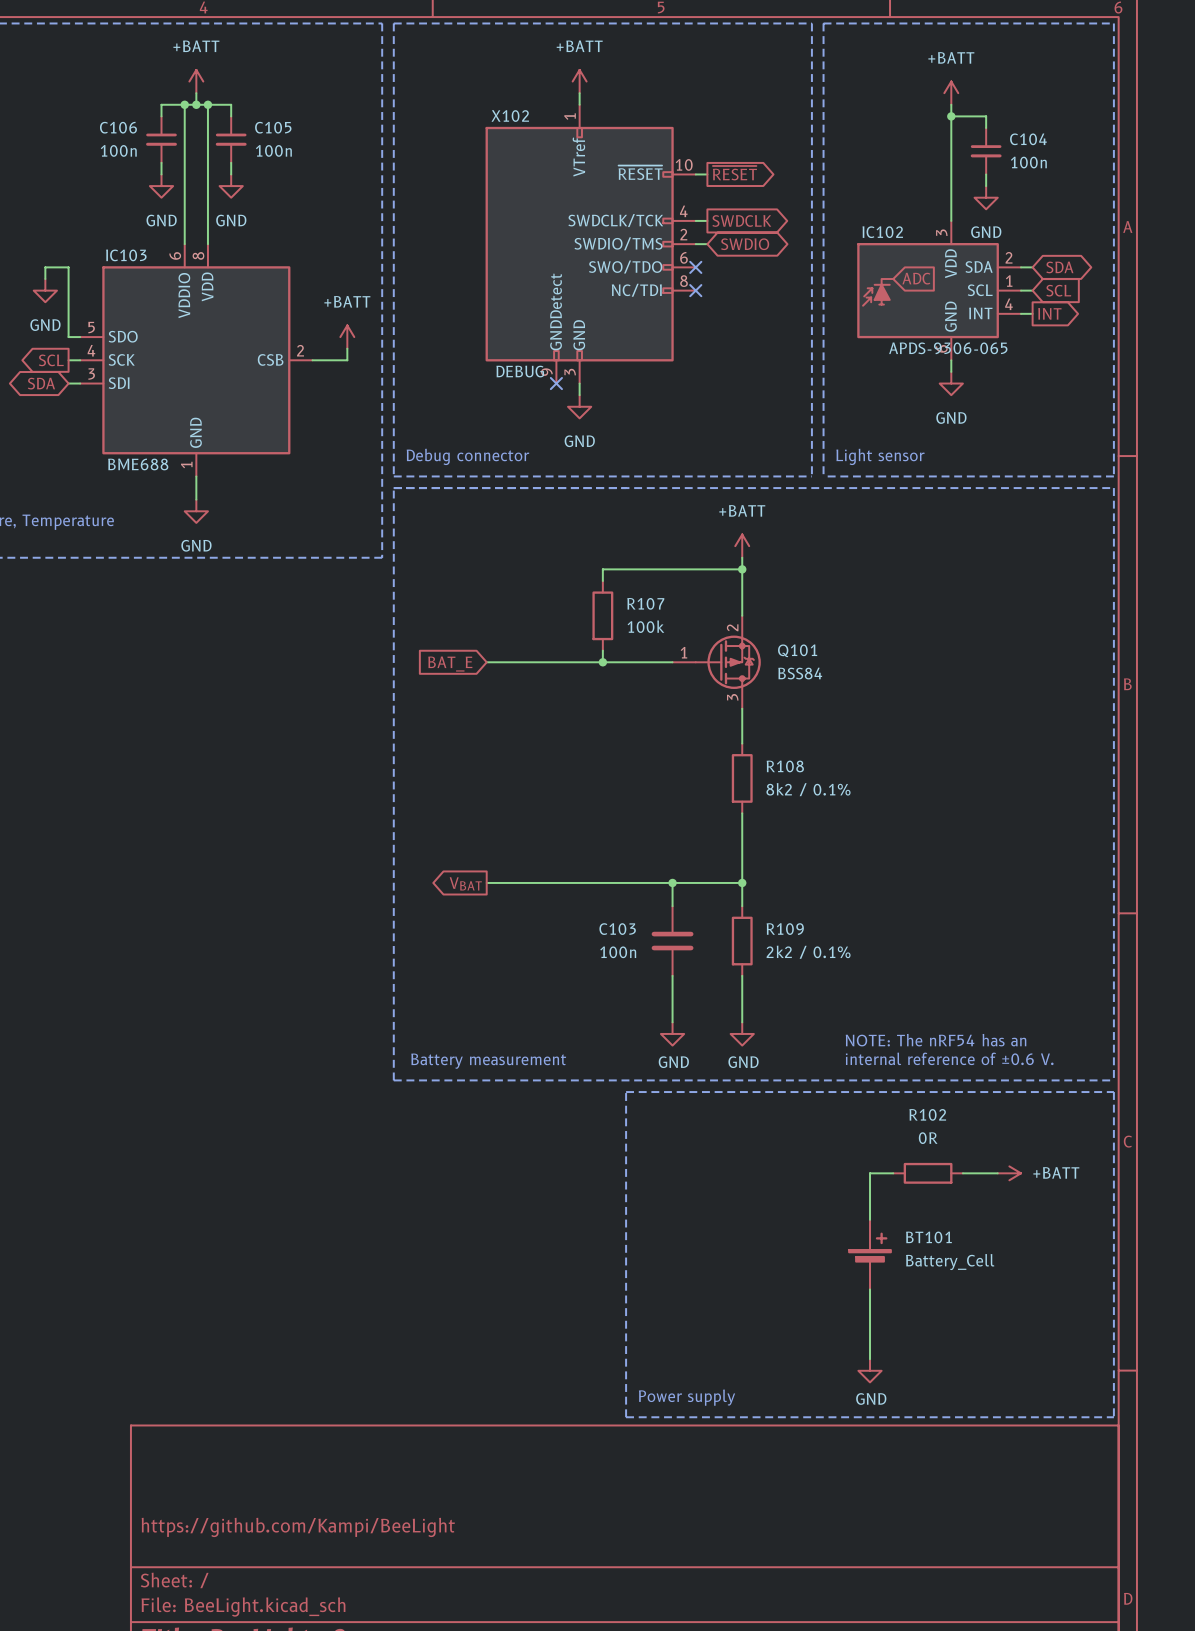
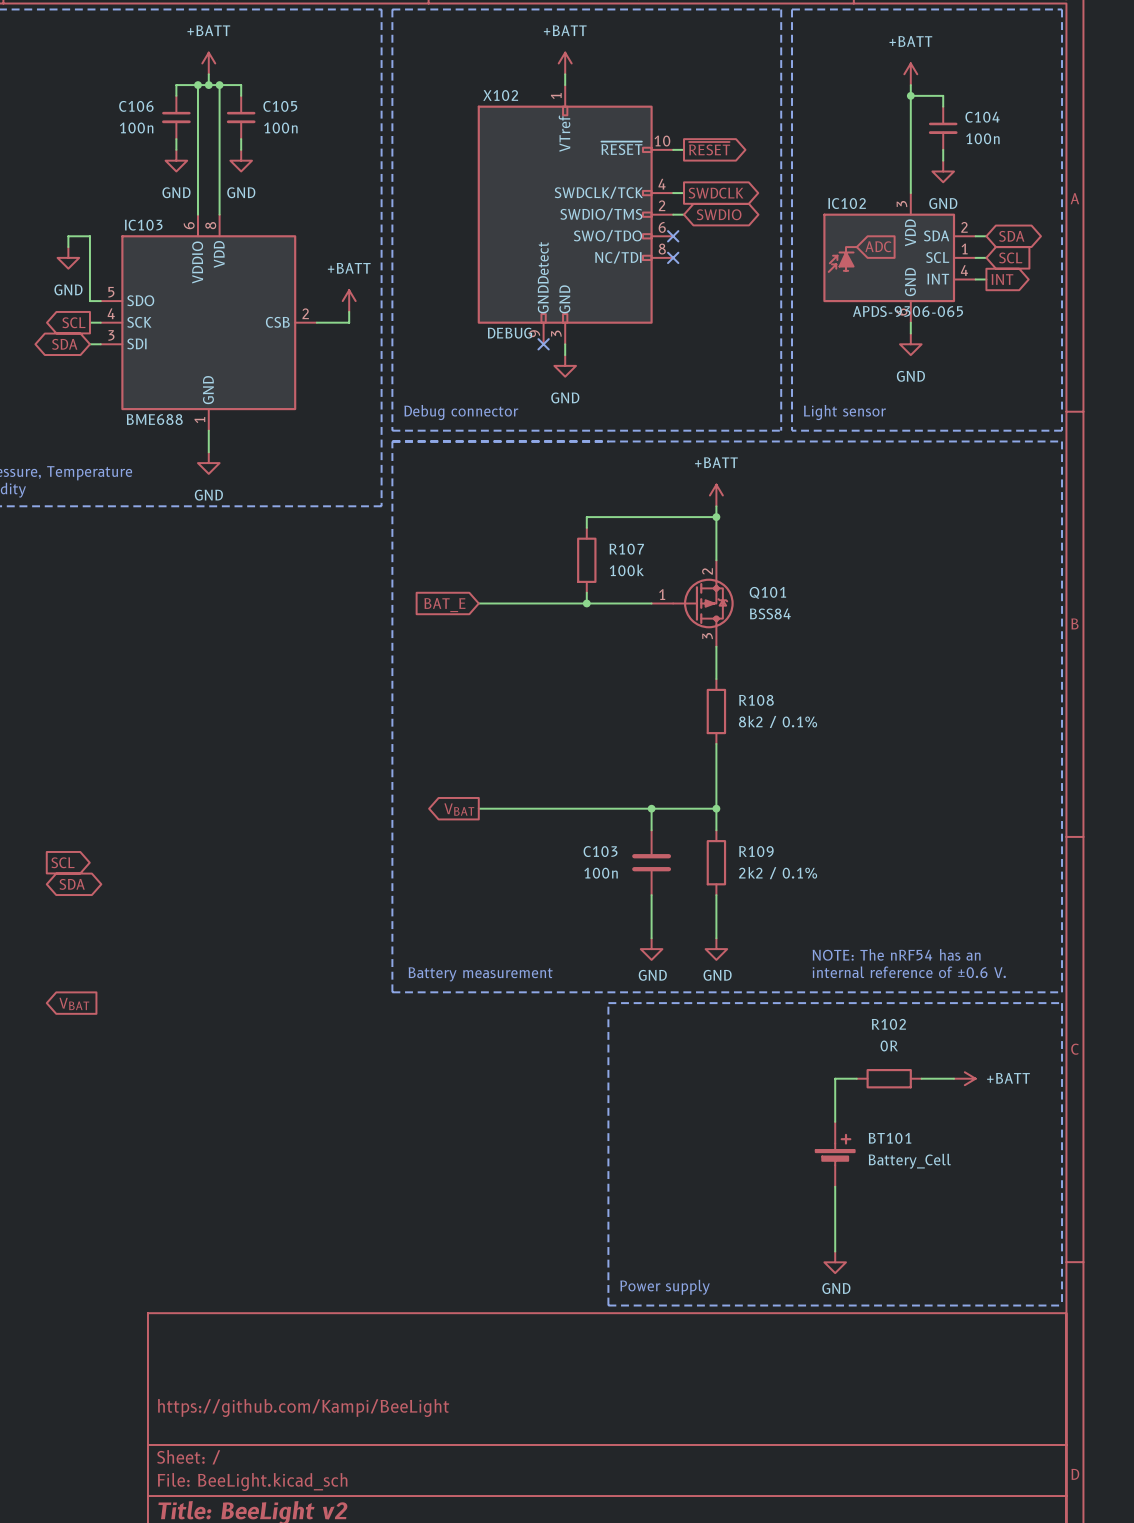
global label: none -> SCL (62, 862)
global label: none -> SDA (72, 884)
global label: none -> VBAT (74, 1003)

